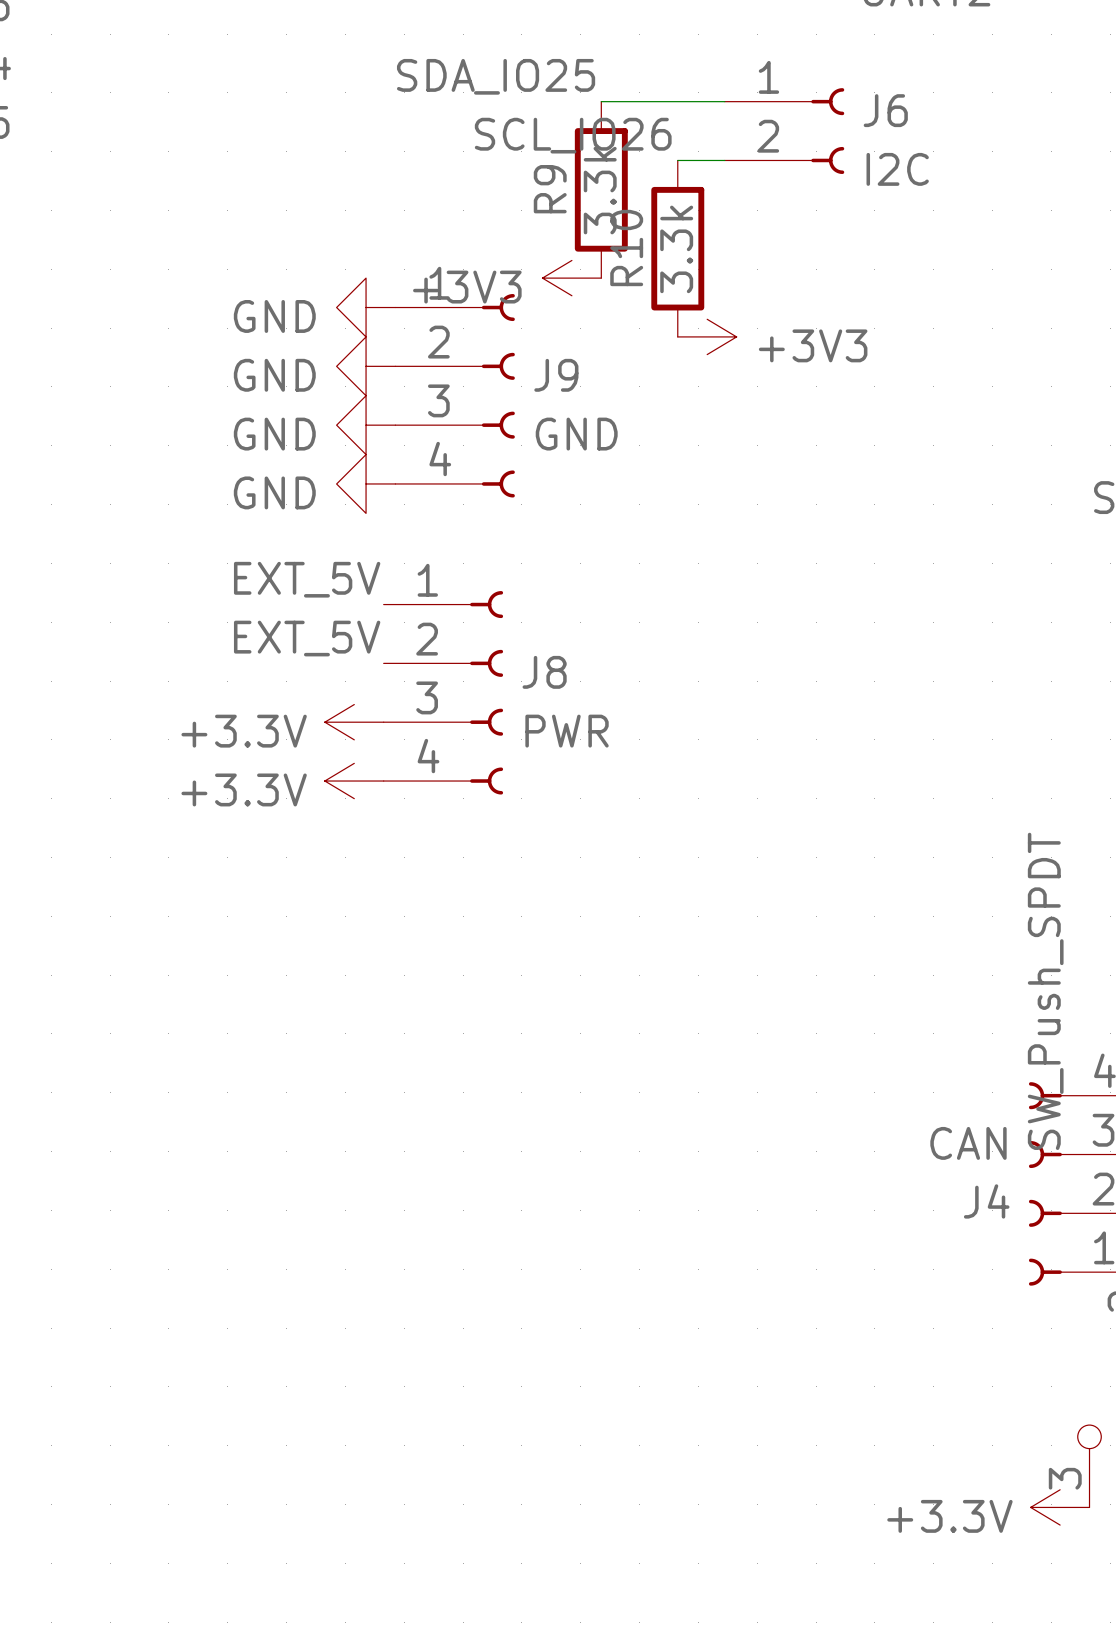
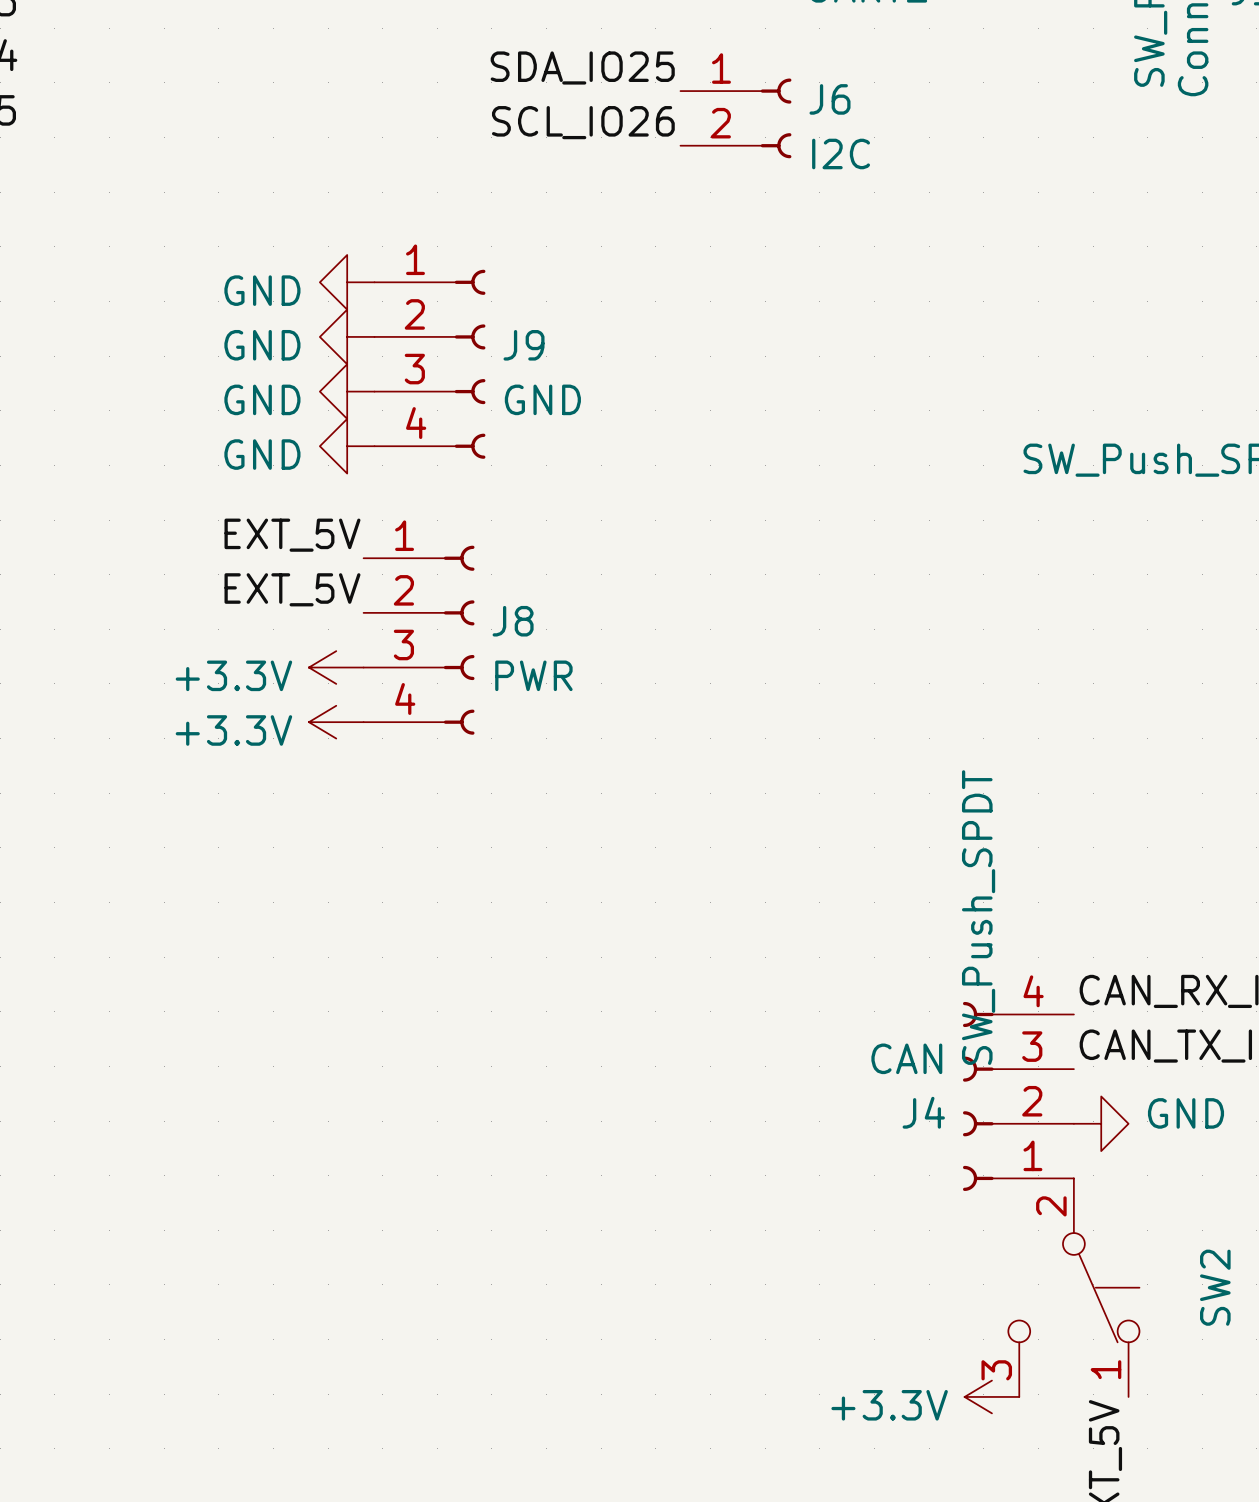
label position: SDA_IO25 (496, 76) -> SDA_IO25 (582, 67)
wire: (601, 101) (724, 101) -> none
label position: SCL_IO26 (573, 135) -> SCL_IO26 (583, 122)
wire: (677, 160) (724, 160) -> none
R9: 3.3k (601, 189) -> none
R10: 3.3k (677, 248) -> none
power symbol: +3V3 (571, 278) -> none
power symbol: +3V3 (707, 336) -> none

